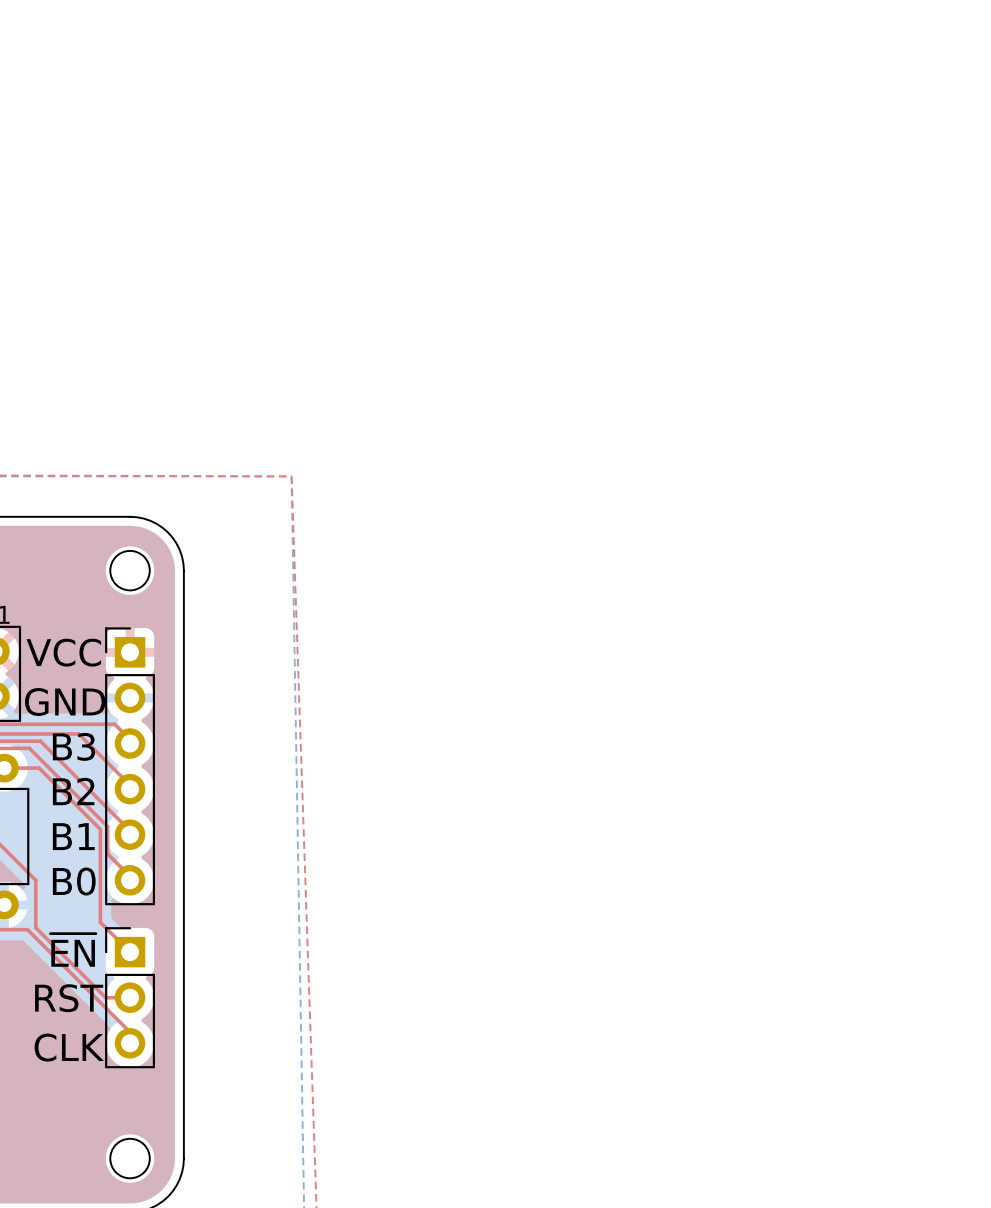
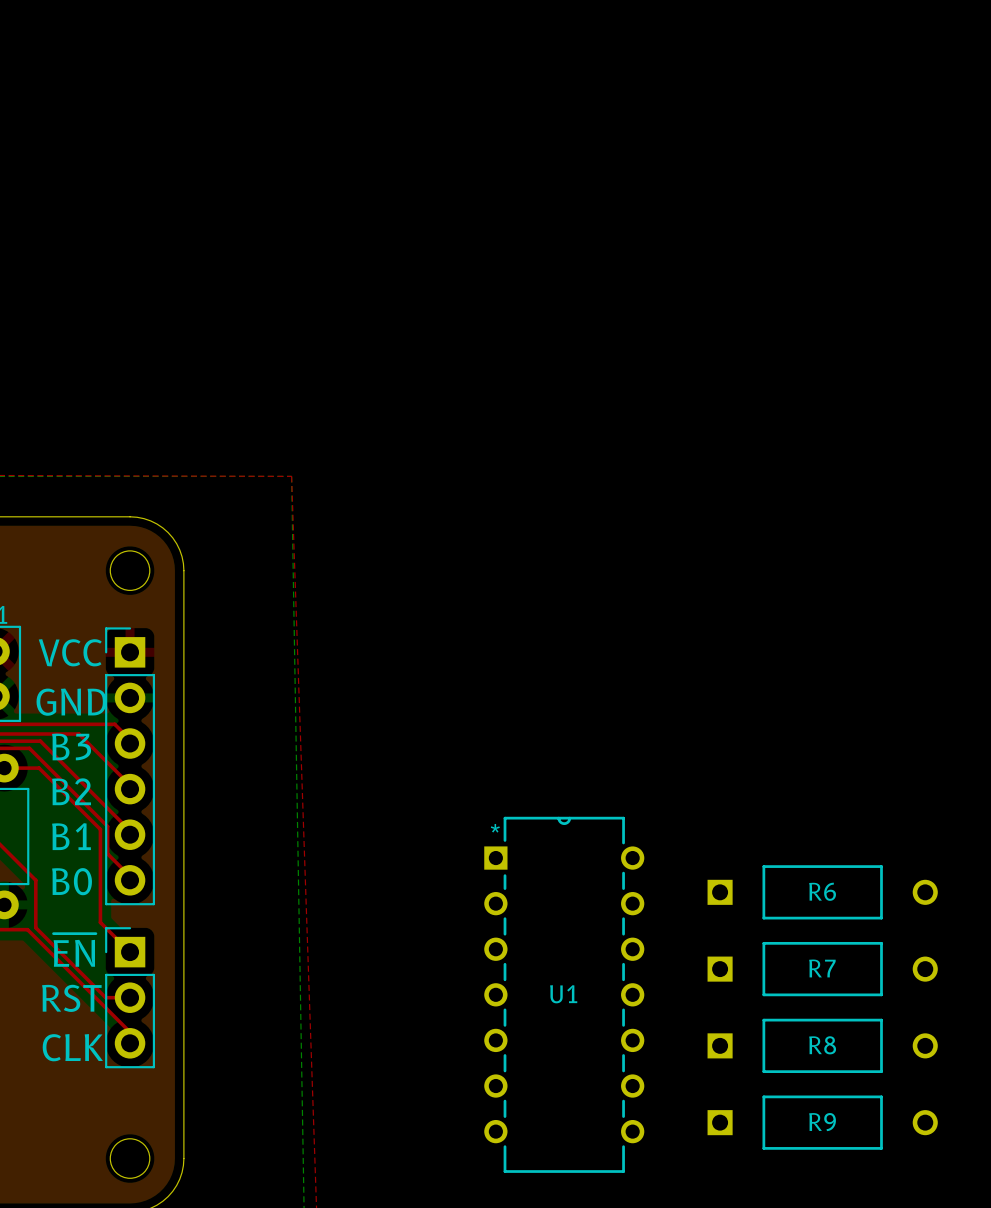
R6: none -> (822, 892)
R7: none -> (822, 969)
U1: none -> (564, 994)
R8: none -> (822, 1045)
R9: none -> (822, 1122)

